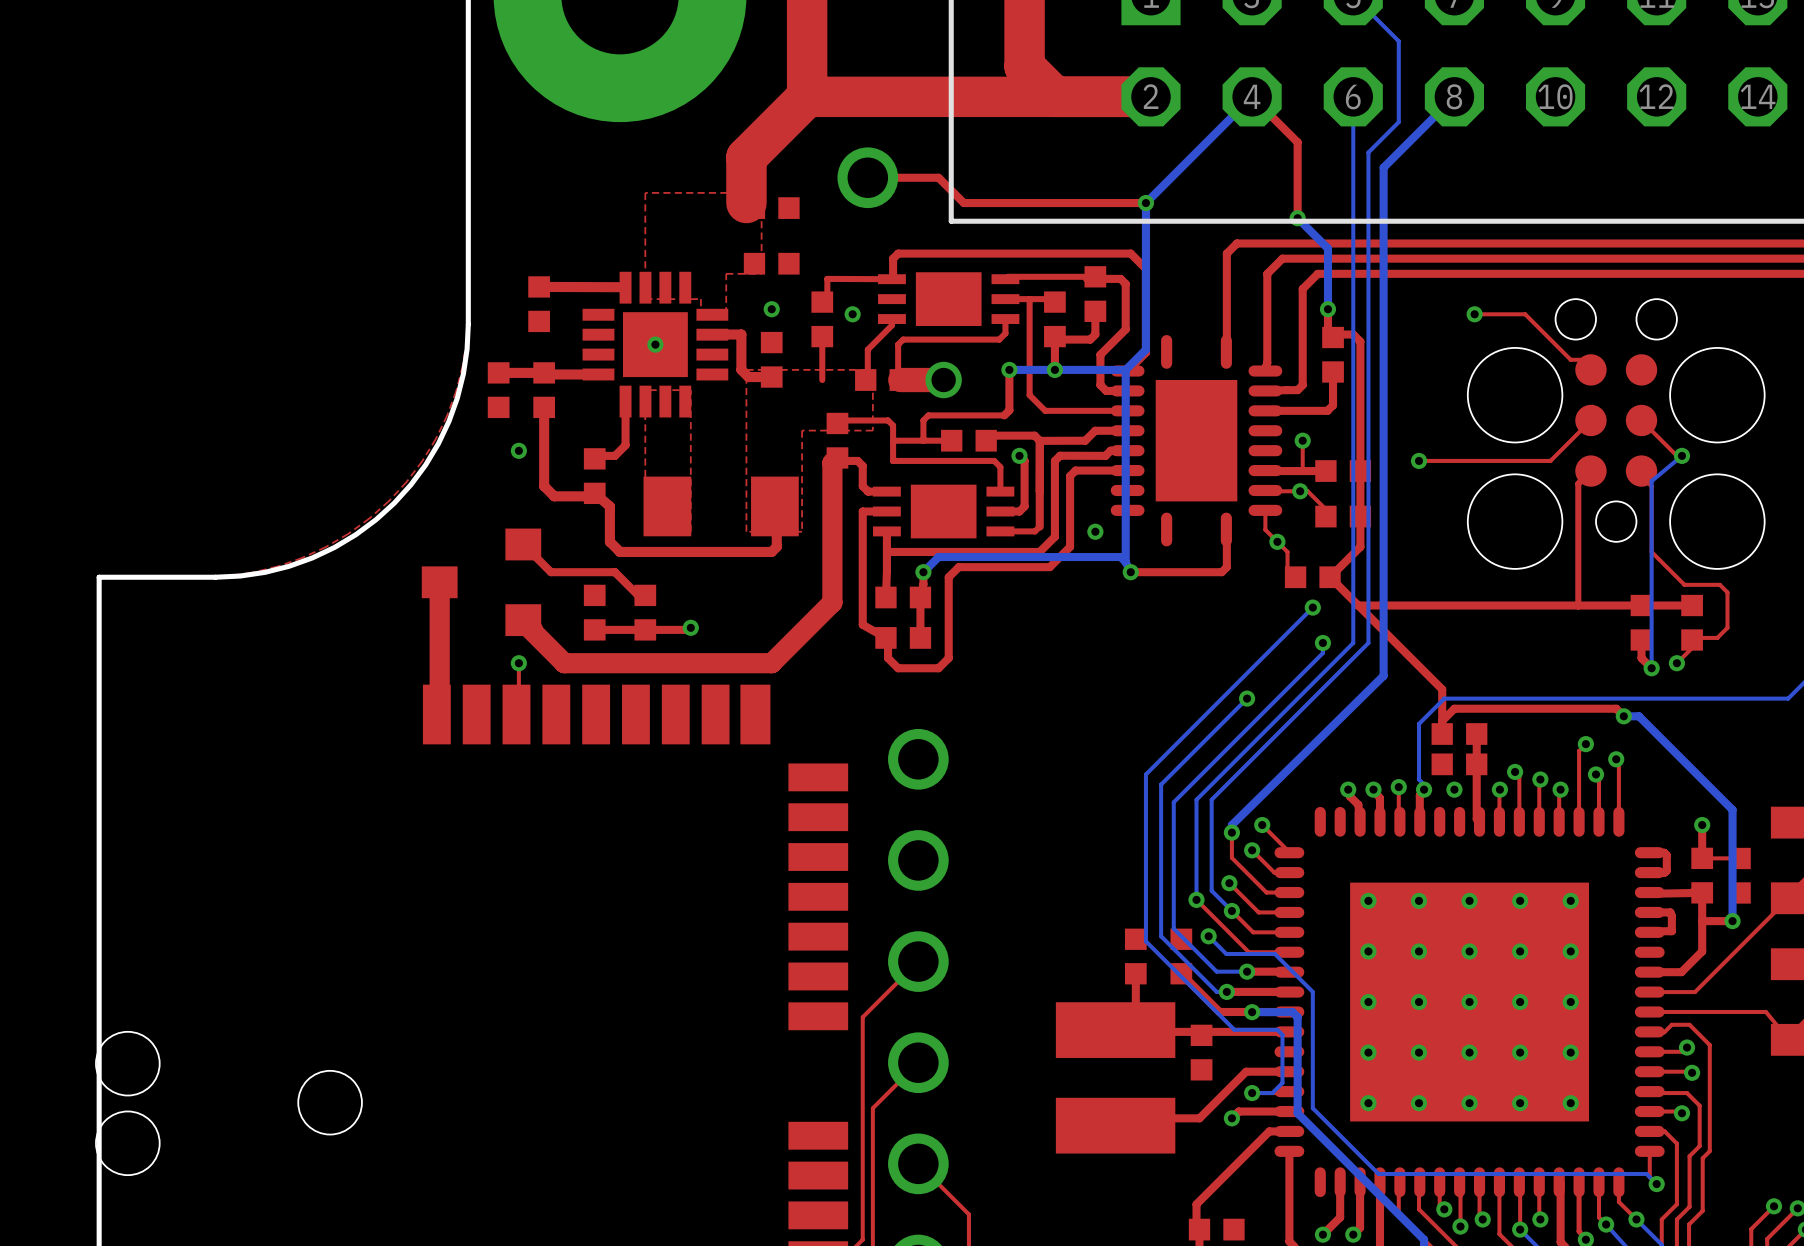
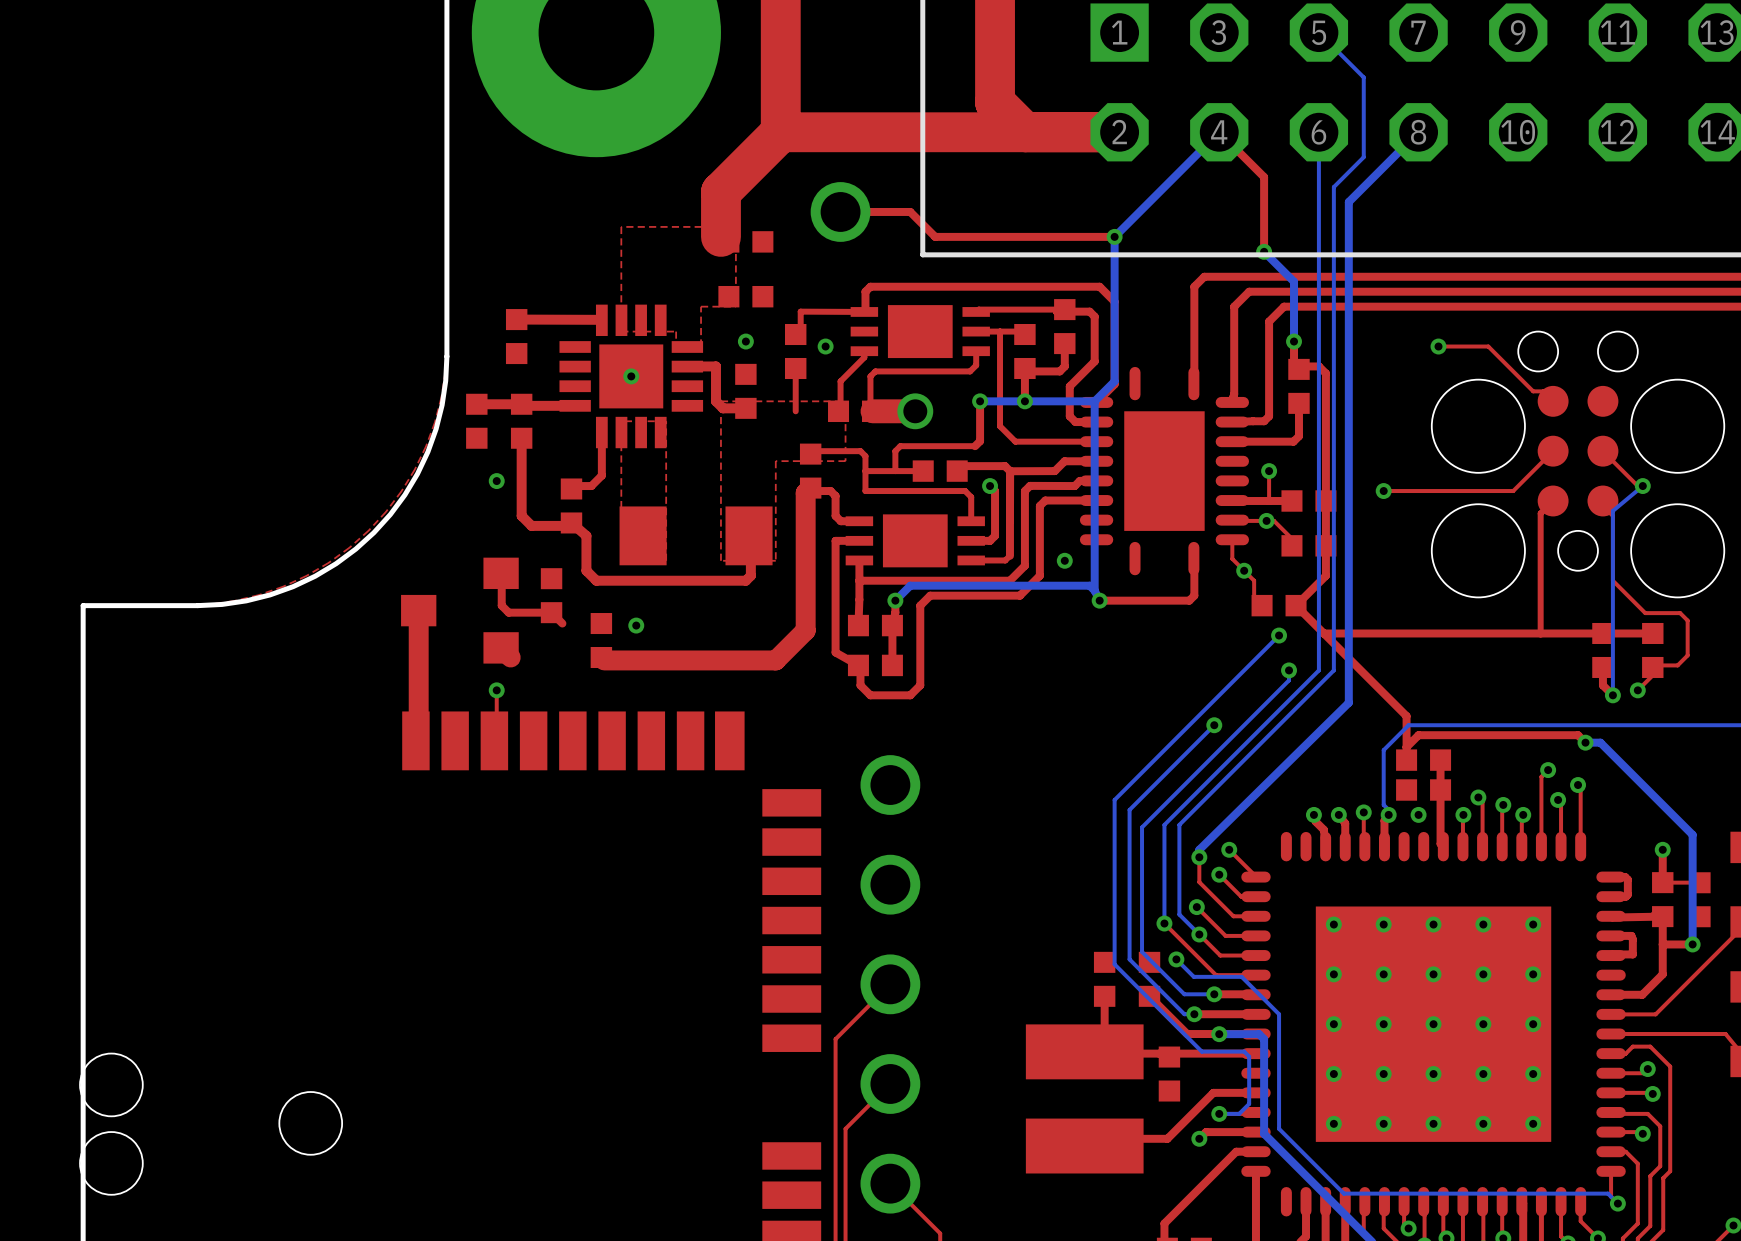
top track: (523, 544) (551, 572) (614, 572) (638, 595) (645, 595) -> (501, 573) (501, 605) (508, 612) (551, 612) (562, 623)
part: none -> (551, 595)
part: (594, 612) -> none
part: none -> (601, 640)
part: (645, 612) -> none
top track: (523, 620) (564, 663) (771, 663) (802, 632) -> (604, 660) (775, 660)
top track: (690, 627) (688, 629) (594, 629) -> none
via position: (690, 627) -> (636, 625)

